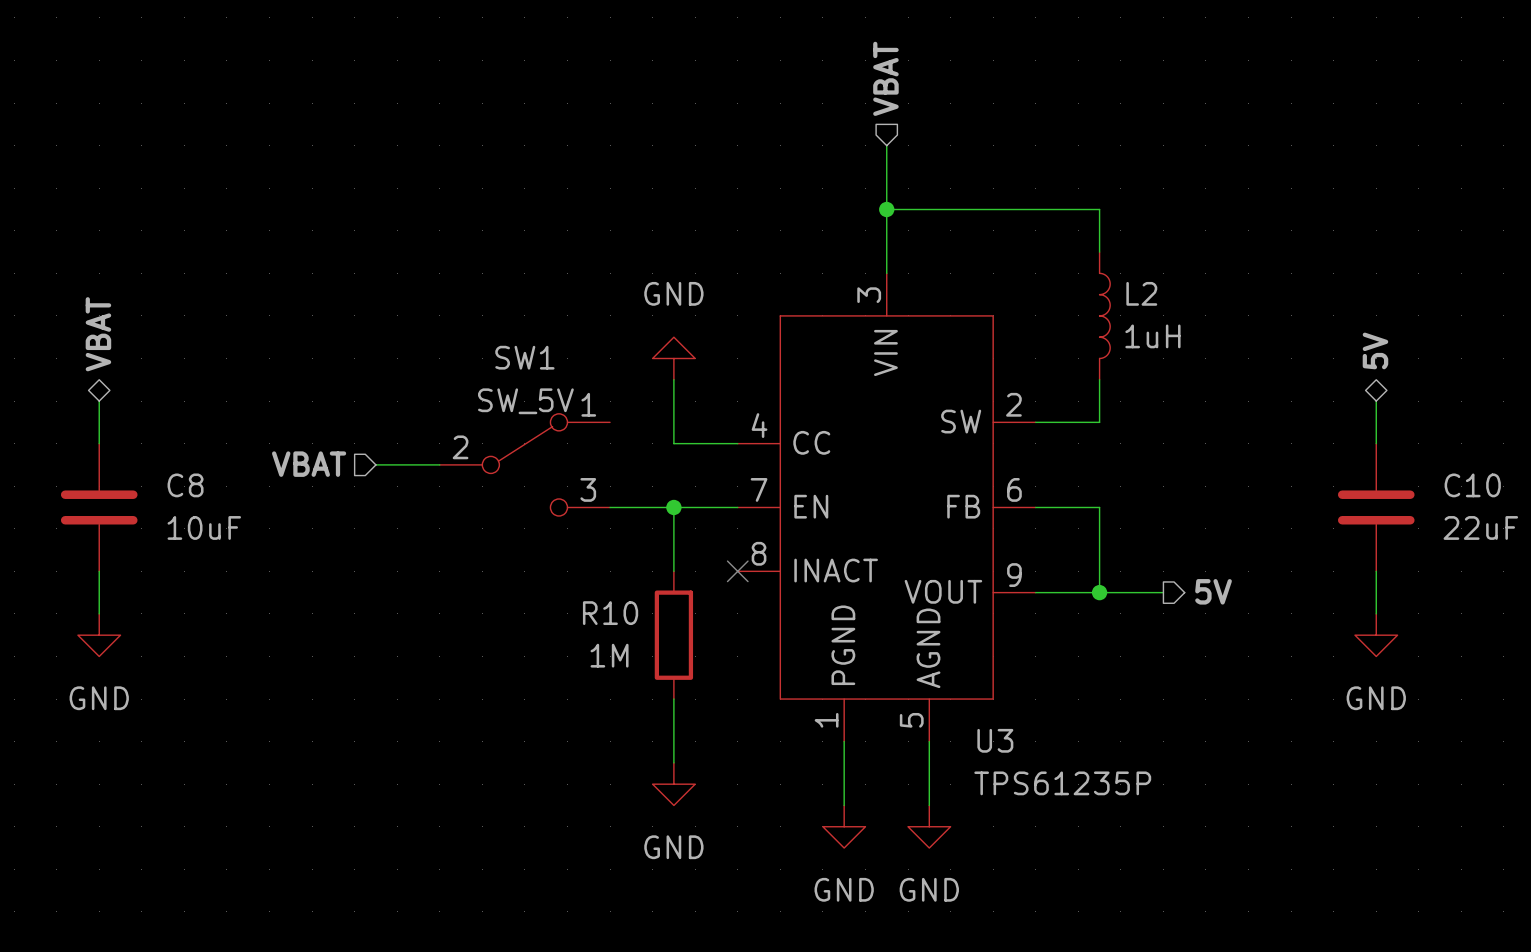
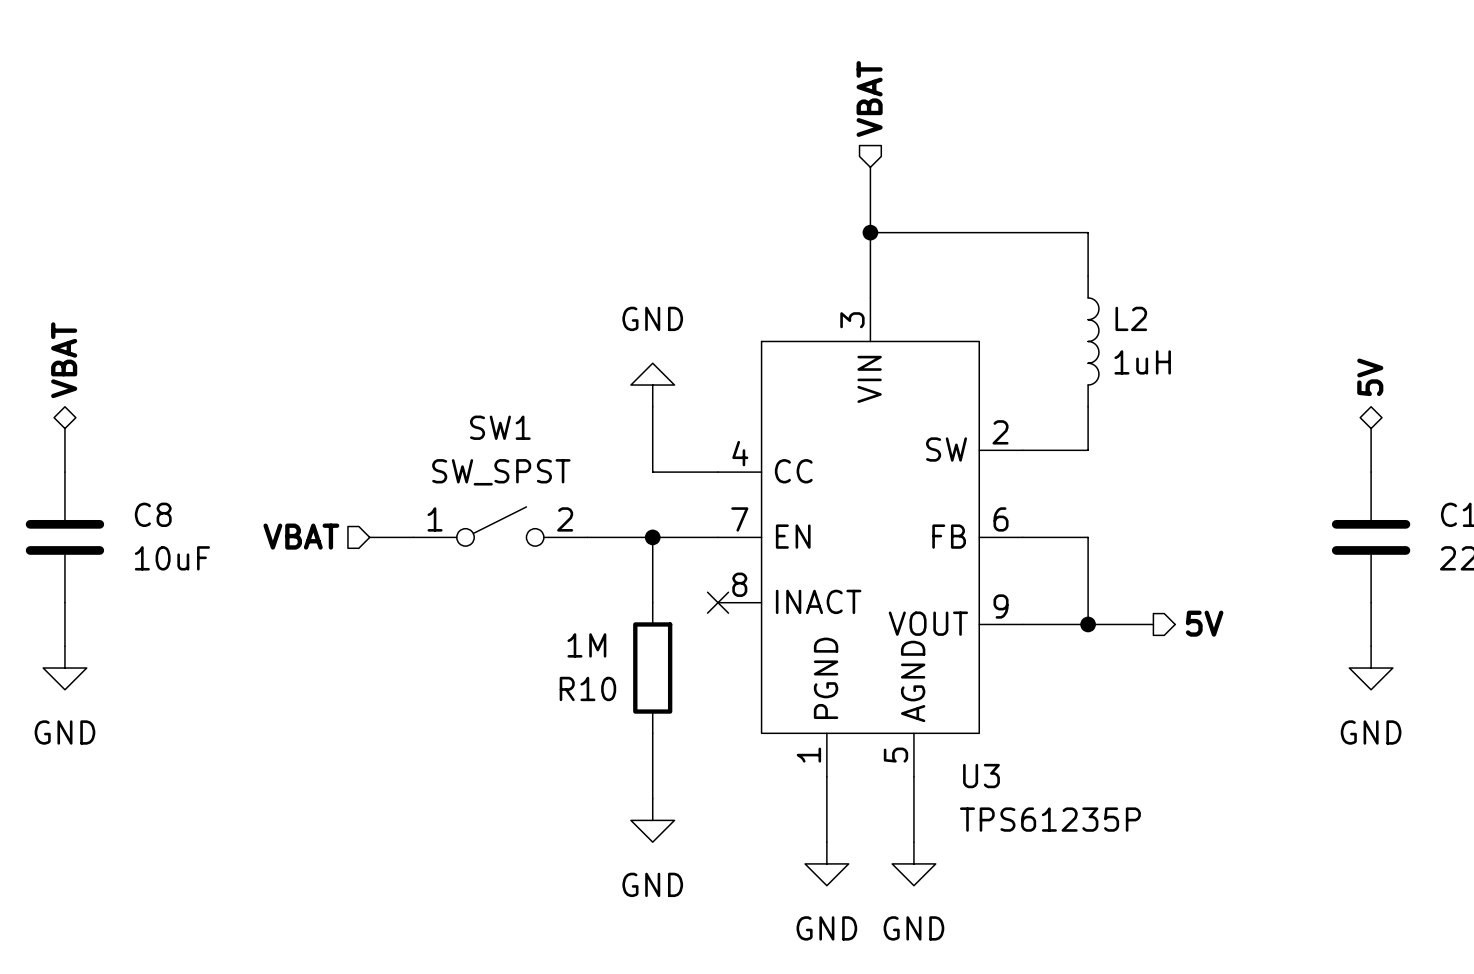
SW1 value: SW_5V (525, 401) -> SW_SPST (501, 472)
SW1 symbol: [439, 413, 611, 516] -> [413, 506, 588, 547]
hierarchical label position: VBAT (309, 464) -> VBAT (301, 536)
wire: (375, 464) (439, 464) -> none
wire: none -> (369, 537) (413, 537)
R10 name position: R10 (610, 613) -> R10 (587, 688)
R10 value position: 1M (609, 655) -> 1M (586, 645)

